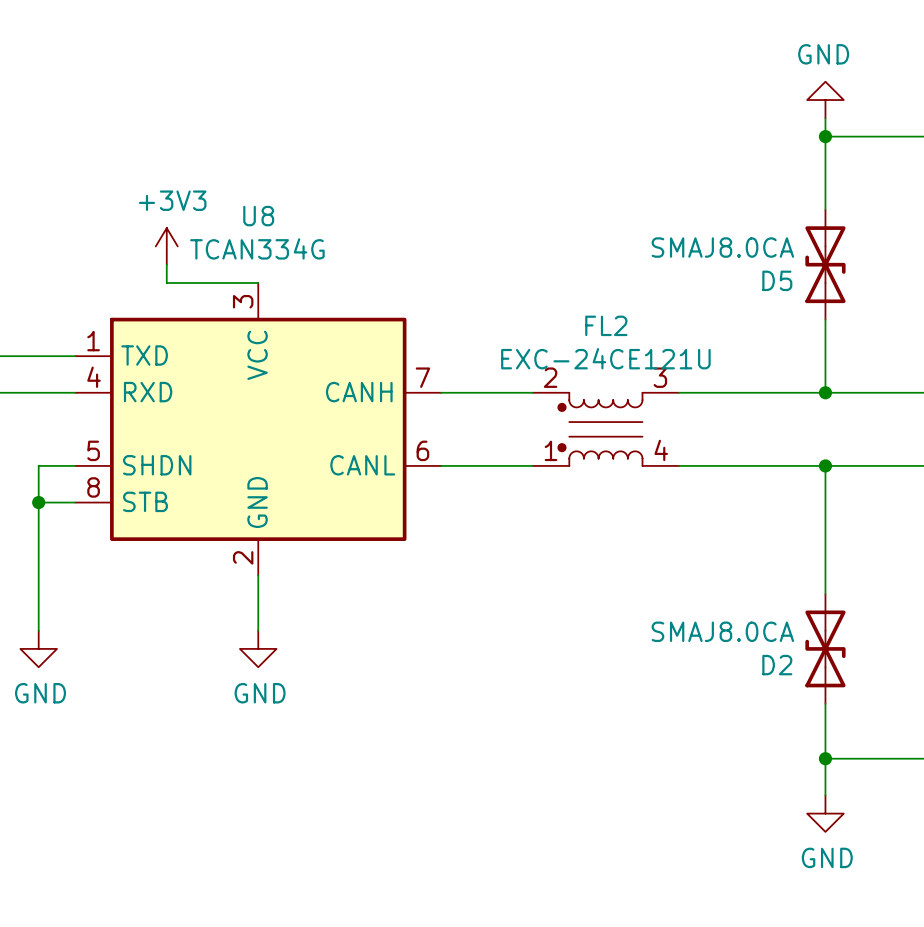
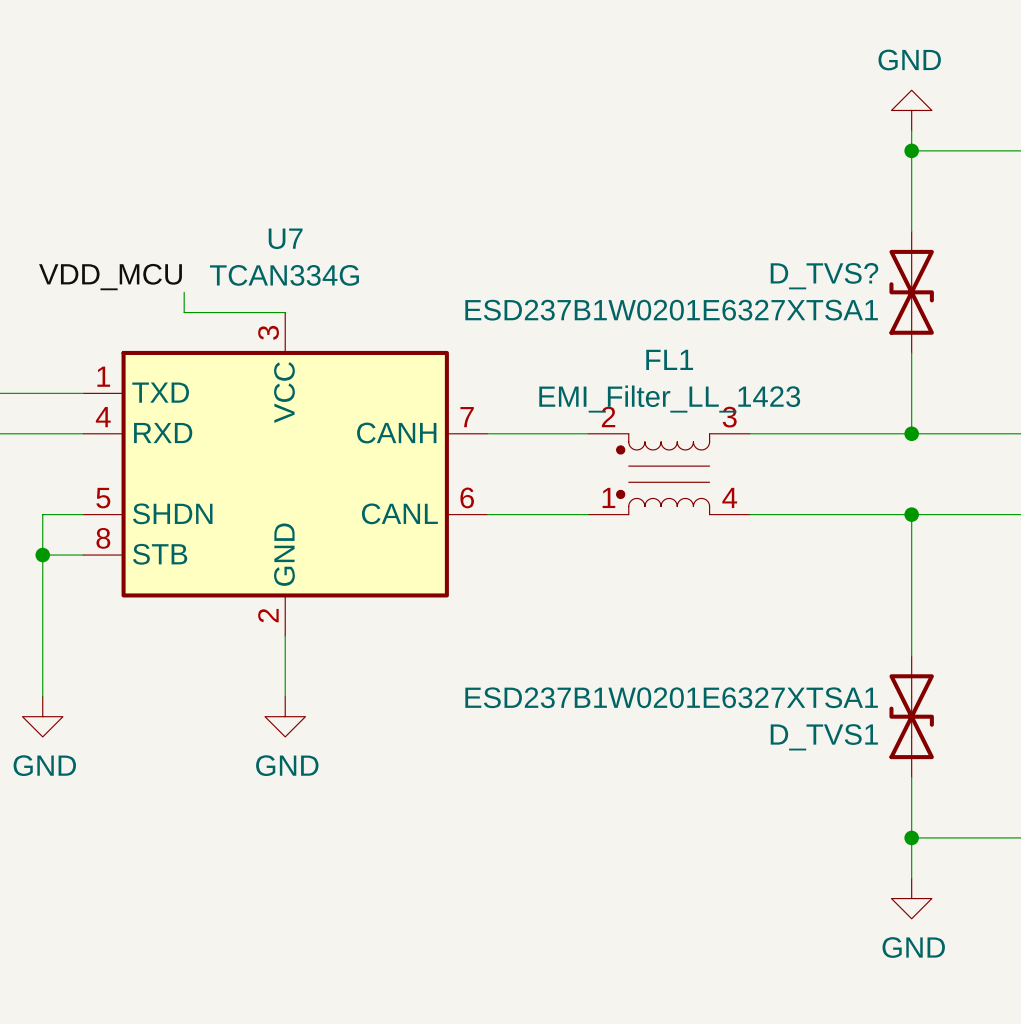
U8 name: U8 (258, 216) -> U7 (285, 238)
power symbol: +3V3 (166, 246) -> none
D5 value: SMAJ8.0CA (722, 247) -> D_TVS? (824, 276)
label: none -> VDD_MCU (110, 277)
D5 name: D5 (777, 280) -> ESD237B1W0201E6327XTSA1 (671, 310)
FL2 name: FL2 (606, 325) -> FL1 (669, 359)
FL2 value: EXC-24CE121U (605, 358) -> EMI_Filter_LL_1423 (669, 399)
D2 value: SMAJ8.0CA (722, 631) -> ESD237B1W0201E6327XTSA1 (671, 697)
D2 name: D2 (777, 665) -> D_TVS1 (824, 737)

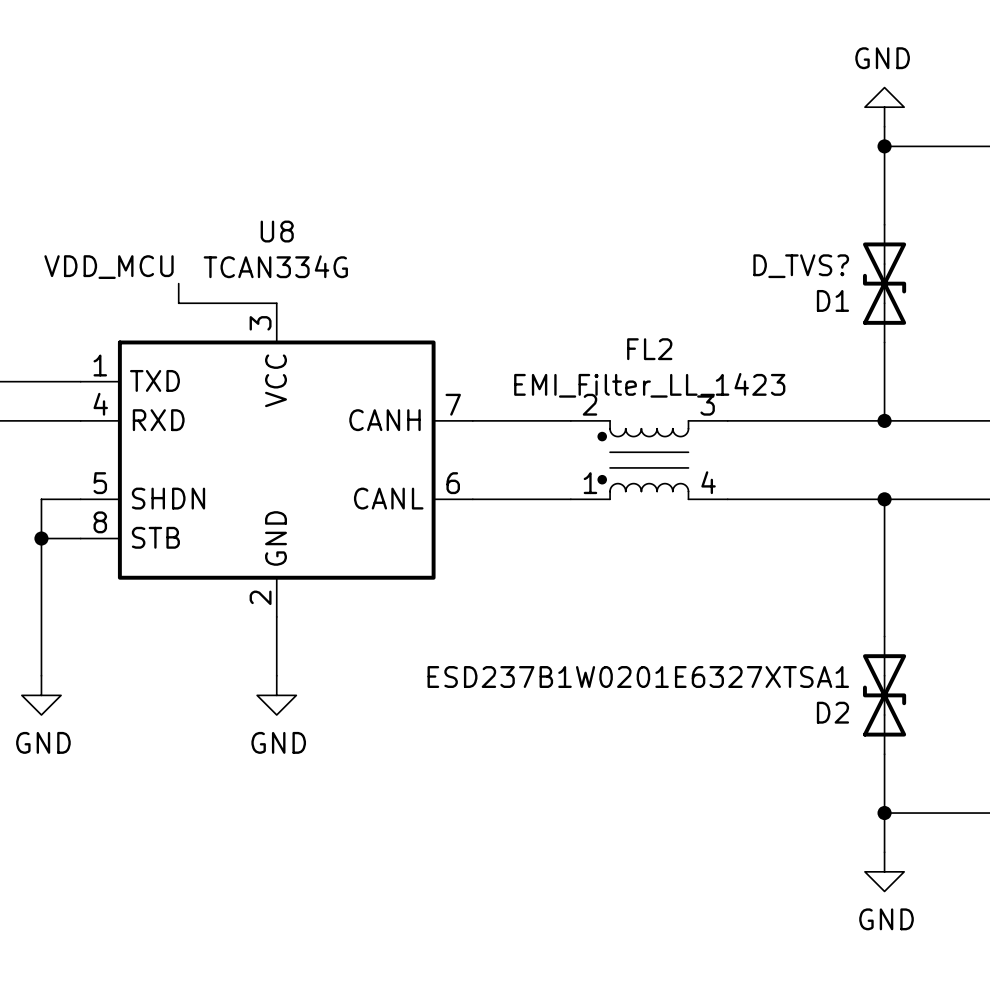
U7 name: U7 (285, 238) -> U8 (277, 231)
ESD237B1W0201E6327XTSA1 name: ESD237B1W0201E6327XTSA1 (671, 310) -> D1 (832, 300)
FL1 name: FL1 (669, 359) -> FL2 (649, 349)
D_TVS1 name: D_TVS1 (824, 737) -> D2 (832, 712)

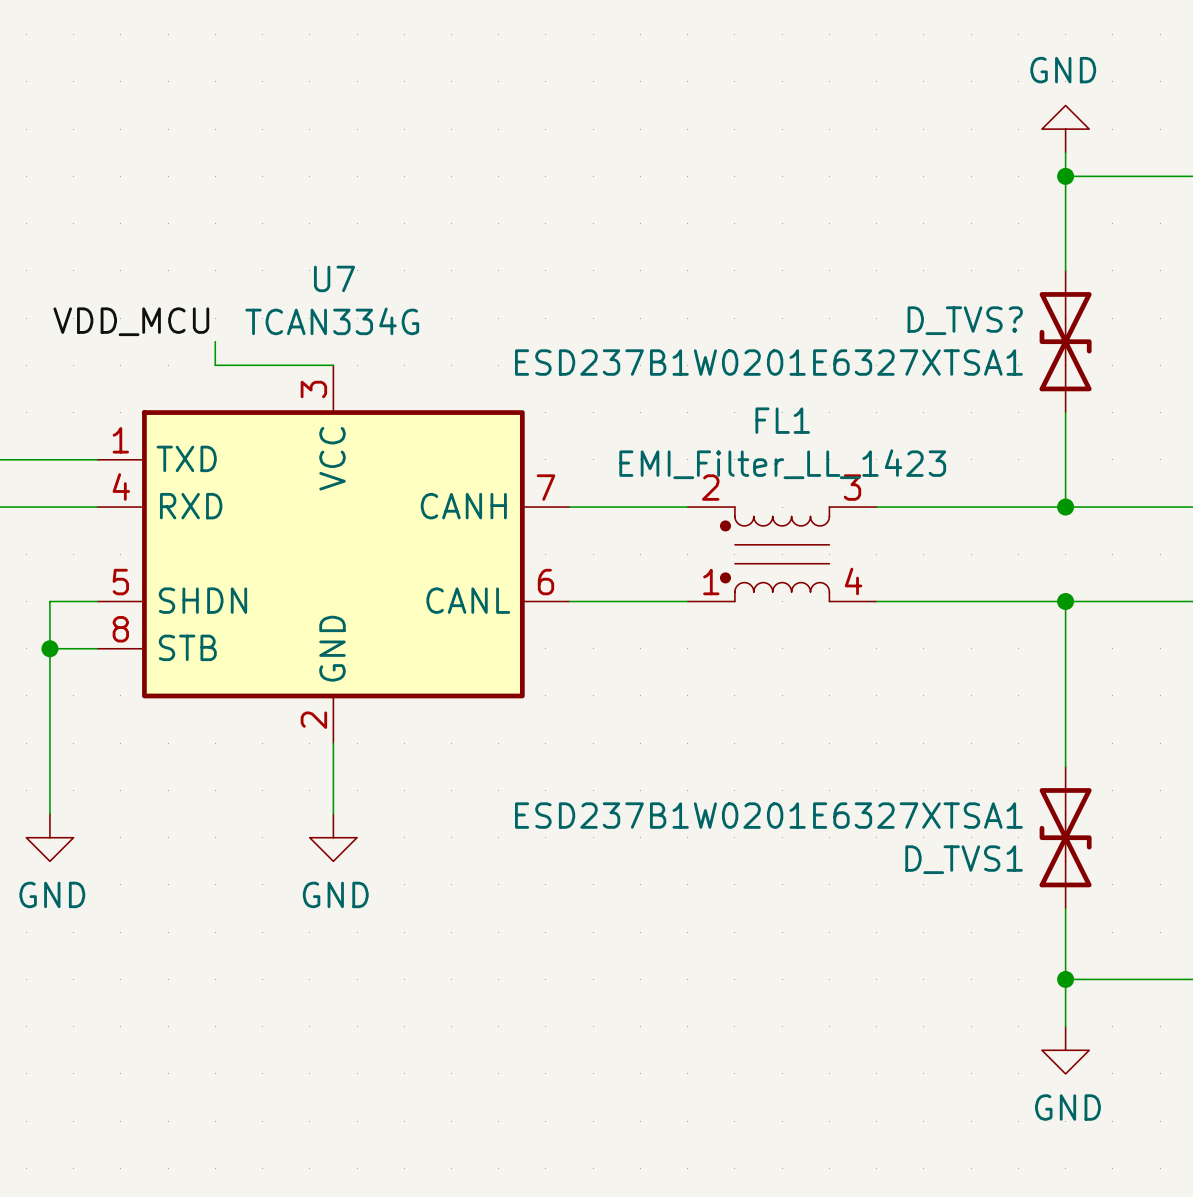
U8 name: U8 (277, 231) -> U7 (334, 278)
D1 name: D1 (832, 300) -> ESD237B1W0201E6327XTSA1 (768, 362)
FL2 name: FL2 (649, 349) -> FL1 (782, 420)
D2 name: D2 (832, 712) -> D_TVS1 (964, 859)

